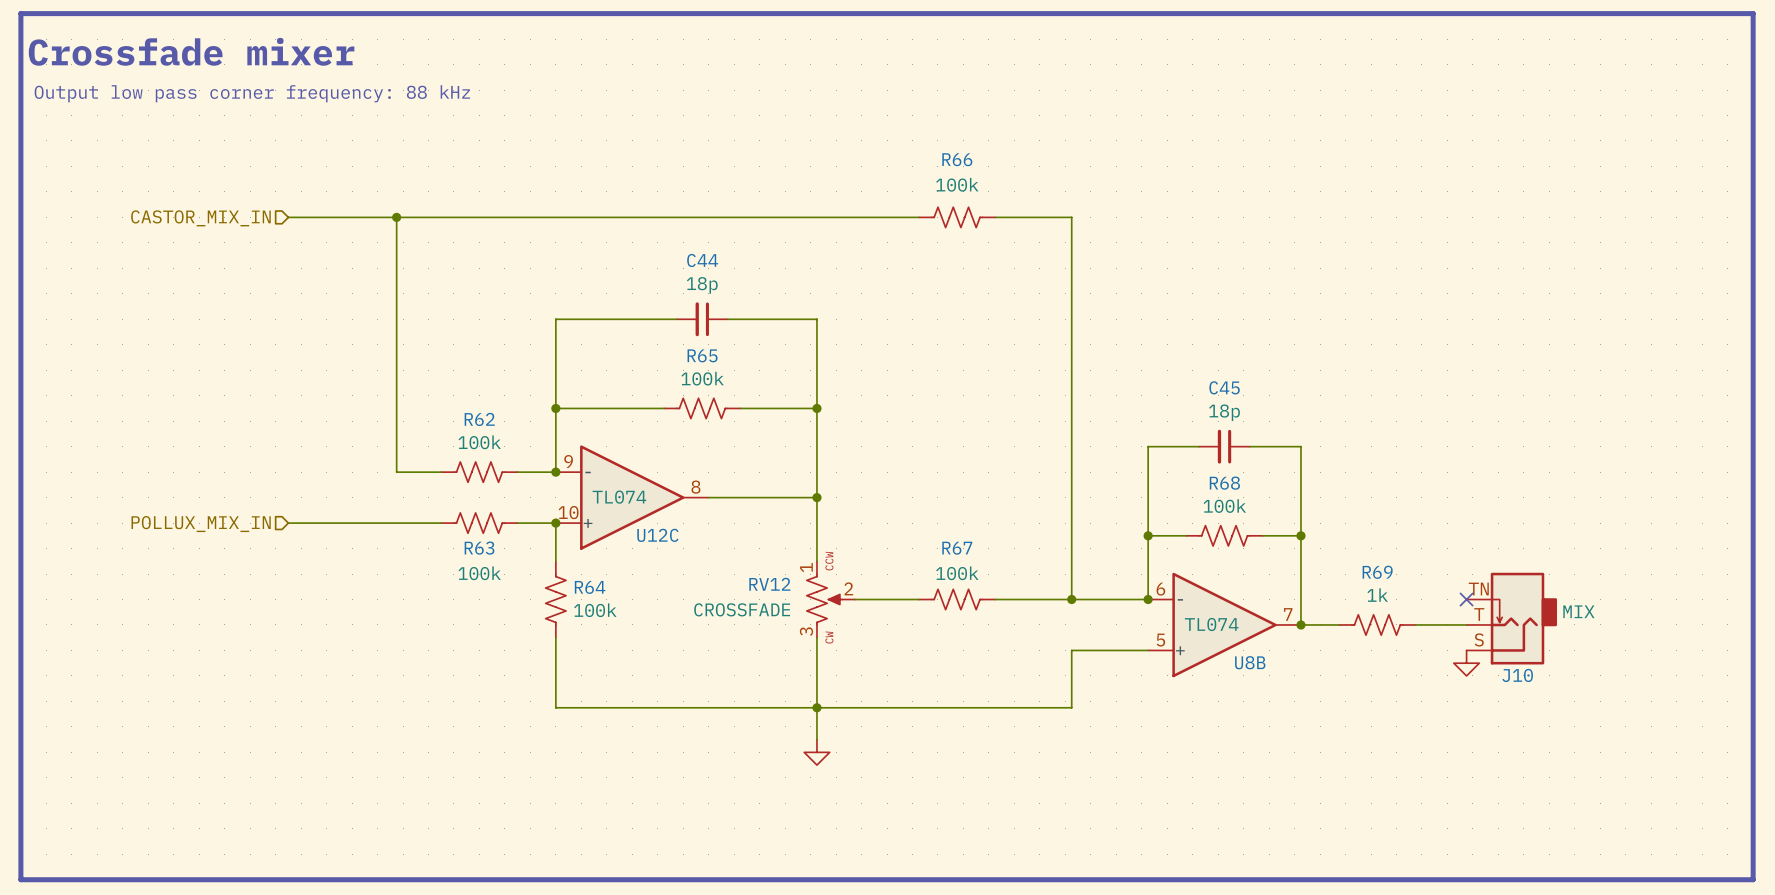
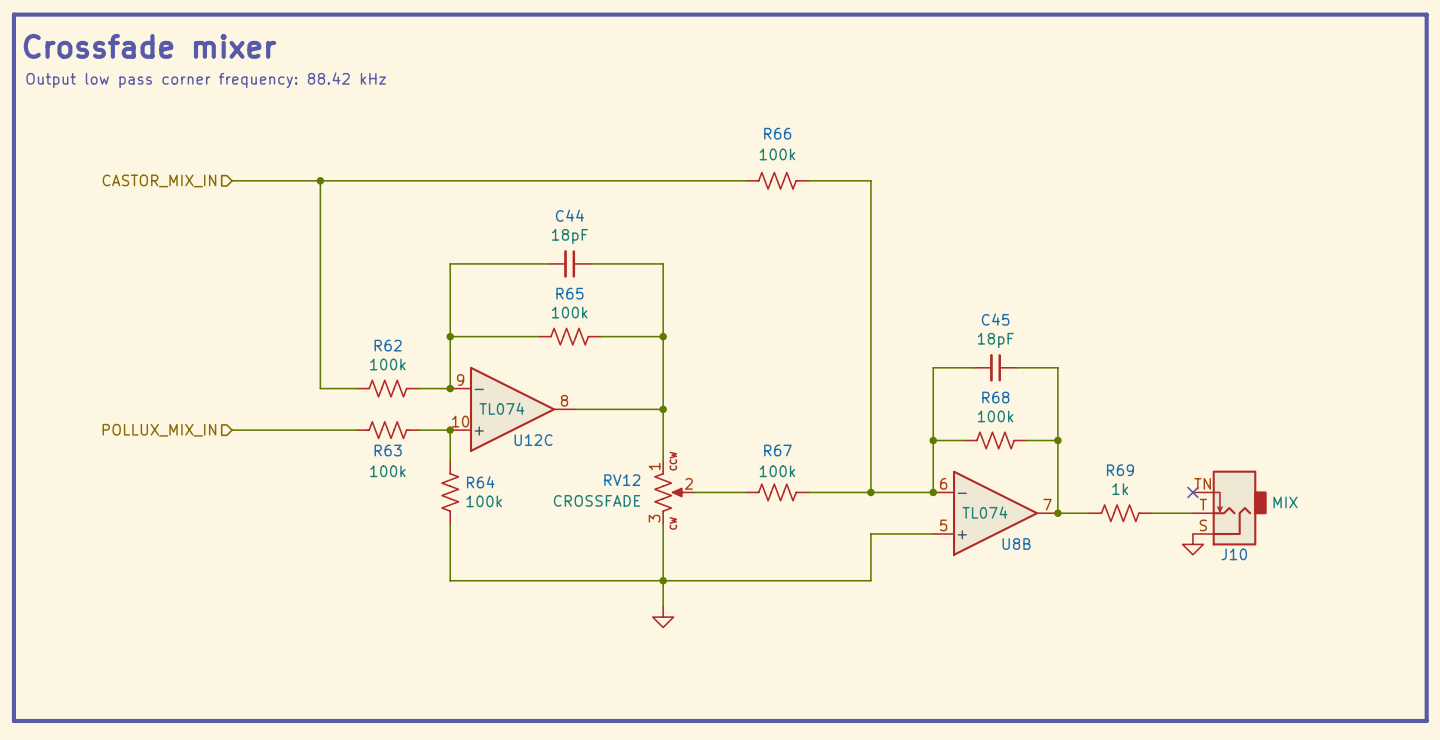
text: Output low pass corner frequency: 88 kHz (252, 93) -> Output low pass corner frequency: 88.42 kHz (206, 80)
C44 value: 18p (702, 285) -> 18pF (569, 236)
C45 value: 18p (1224, 412) -> 18pF (995, 340)

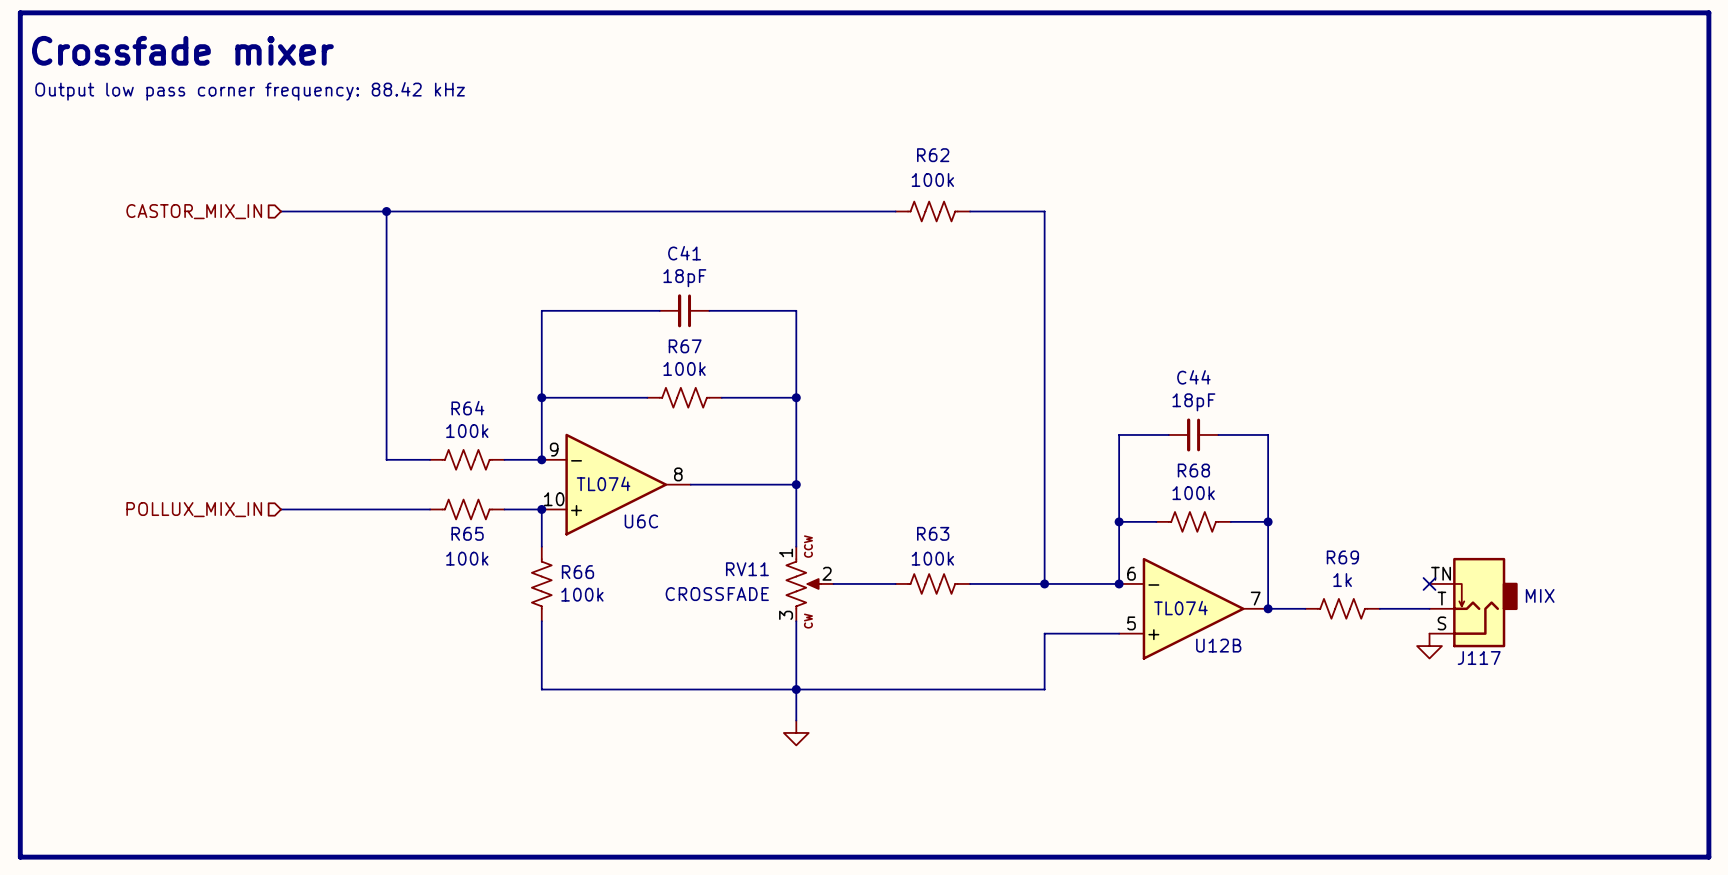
R66 name: R66 (777, 133) -> R62 (933, 155)
C44 name: C44 (569, 215) -> C41 (684, 253)
R65 name: R65 (569, 293) -> R67 (685, 346)
C45 name: C45 (995, 319) -> C44 (1193, 377)
R62 name: R62 (388, 345) -> R64 (467, 408)
U12C name: U12C (533, 440) -> U6C (641, 521)
R63 name: R63 (388, 450) -> R65 (467, 533)
R67 name: R67 (777, 450) -> R63 (933, 533)
RV12 name: RV12 (622, 480) -> RV11 (747, 569)
R64 name: R64 (480, 482) -> R66 (577, 572)
U8B name: U8B (1016, 544) -> U12B (1218, 645)
J10 name: J10 (1234, 554) -> J117 (1479, 658)

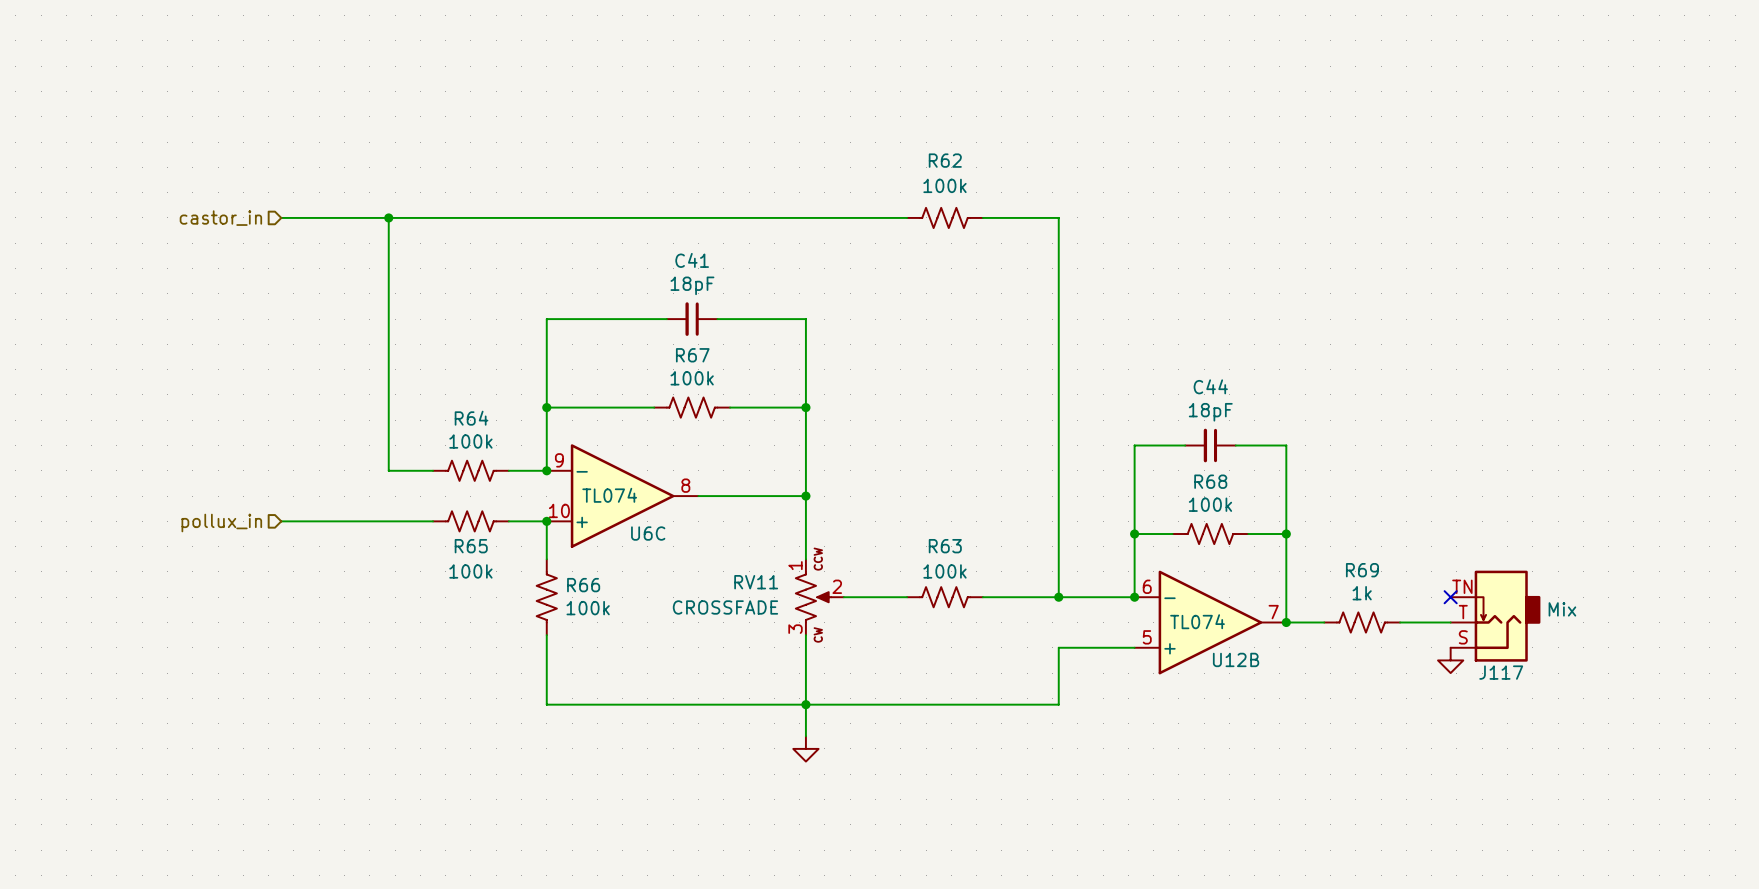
line: (20, 12) (20, 857) (1708, 857) (1708, 12) (20, 12) -> none
text: Crossfade mixer (182, 50) -> none
text: Output low pass corner frequency: 88.42 kHz (250, 91) -> none
hierarchical label: CASTOR_MIX_IN (194, 211) -> castor_in (220, 218)
hierarchical label: POLLUX_MIX_IN (194, 509) -> pollux_in (221, 522)
J117 value: MIX (1540, 595) -> Mix (1562, 609)

